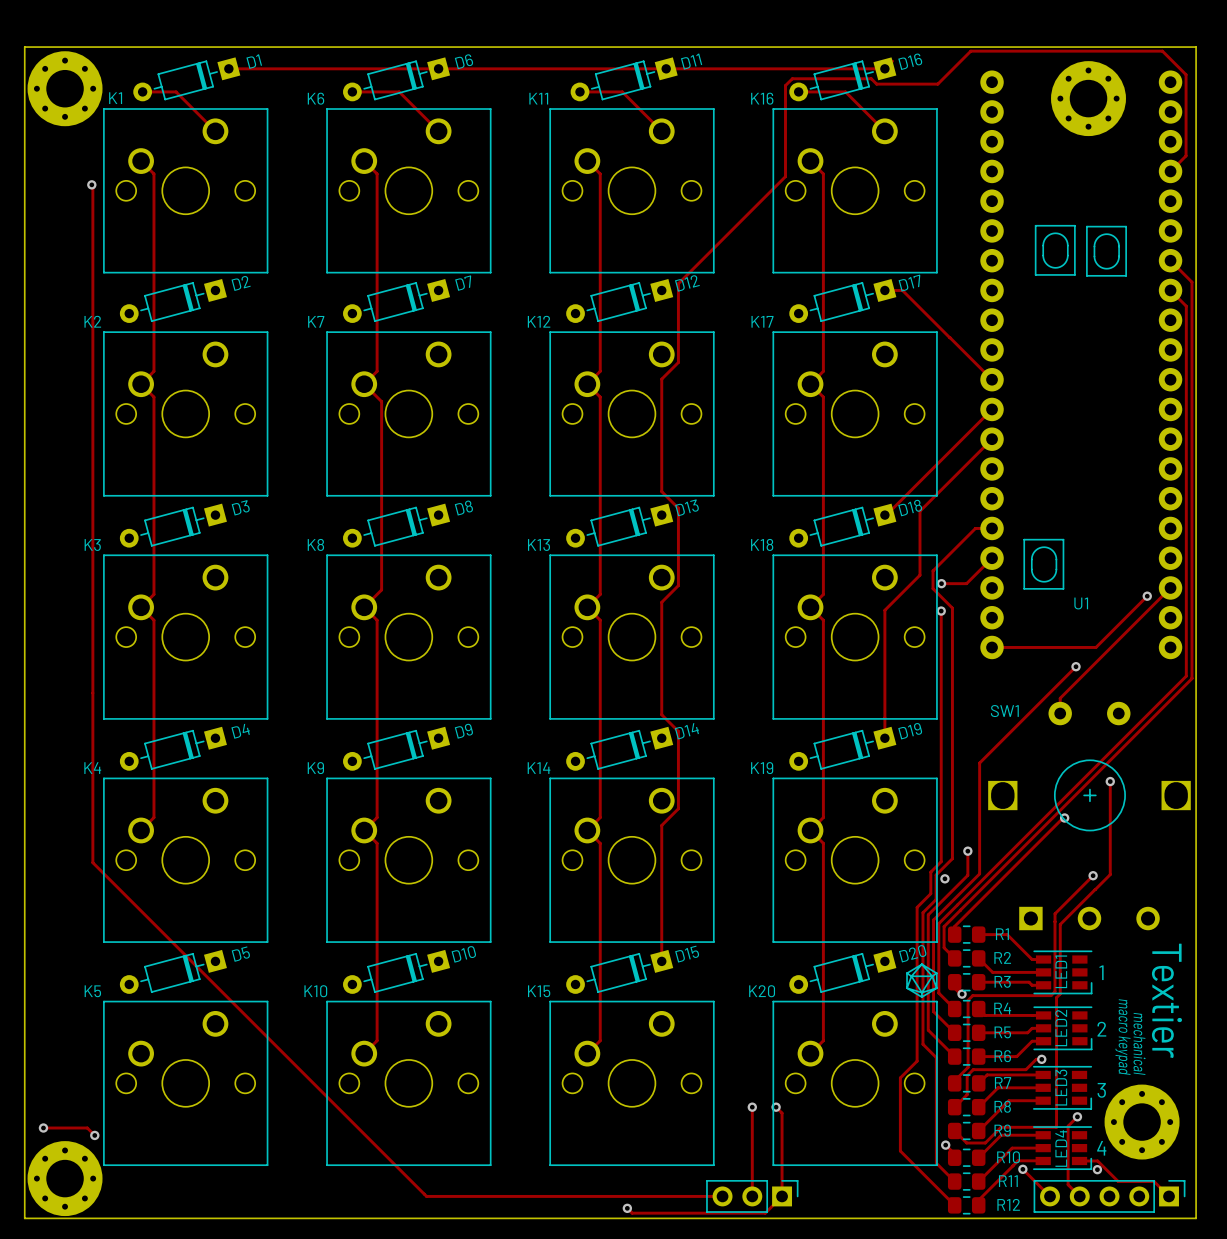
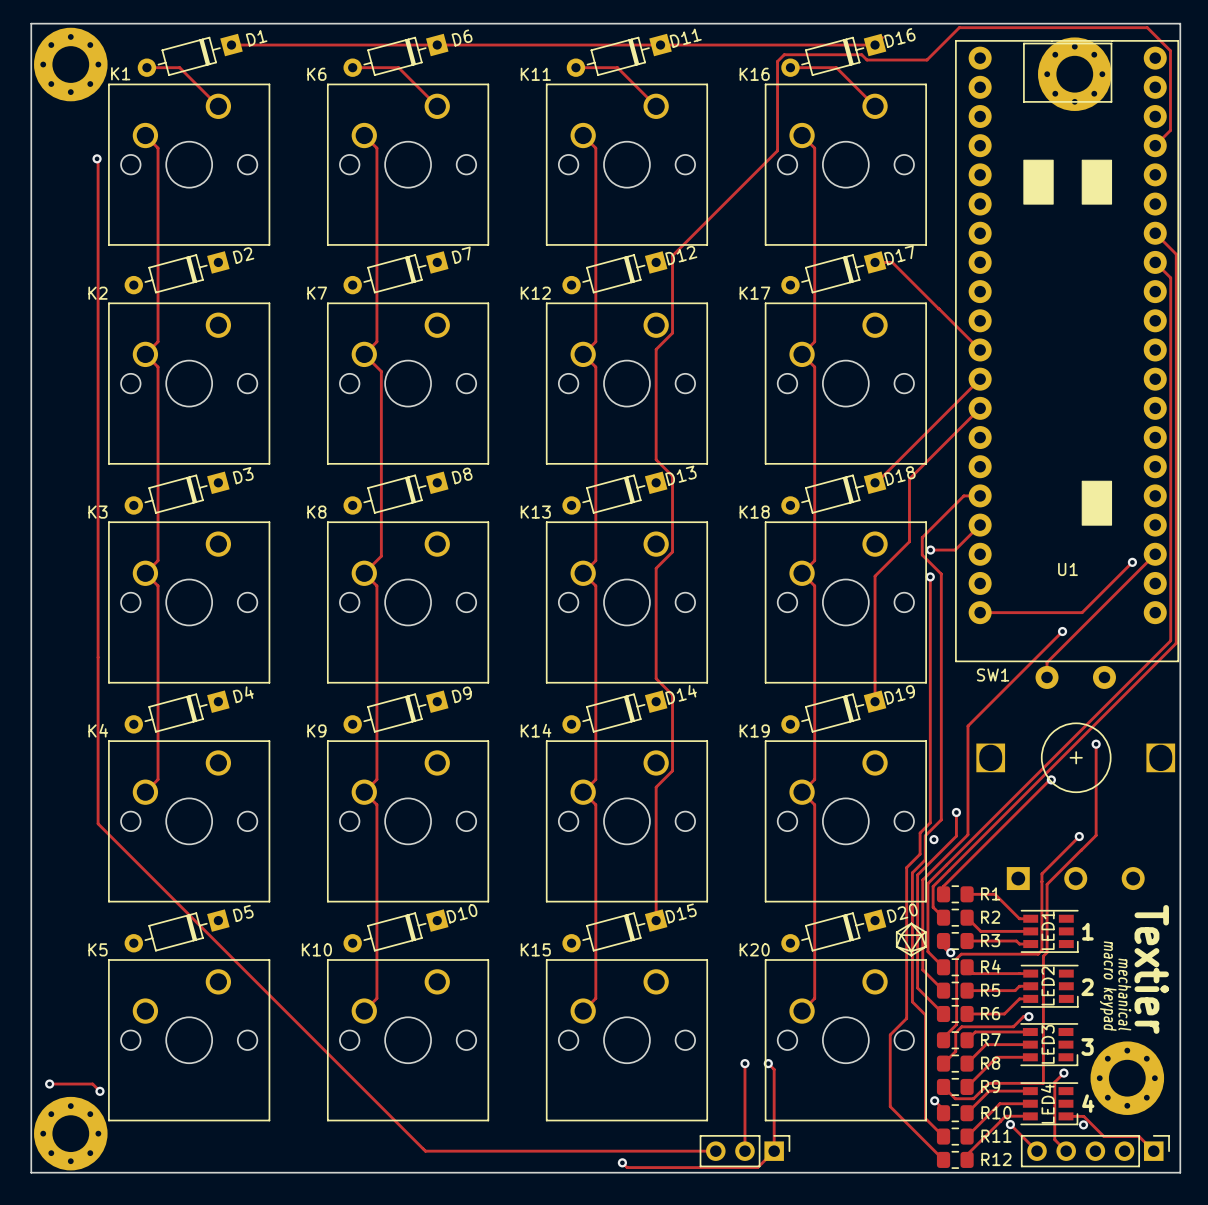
U1 footprint: [980, 70, 1183, 660] -> [955, 40, 1179, 663]

